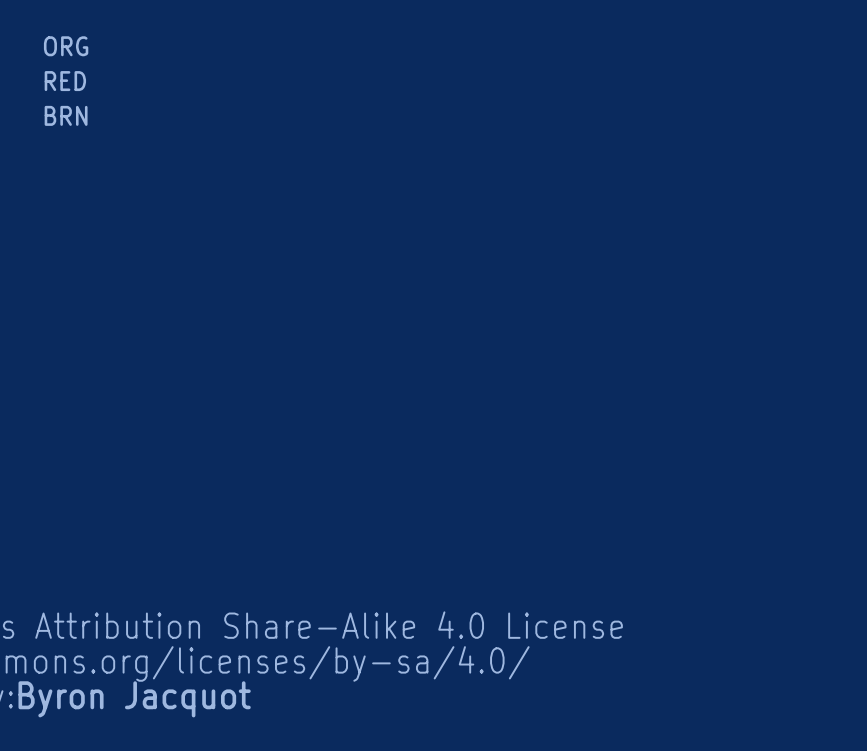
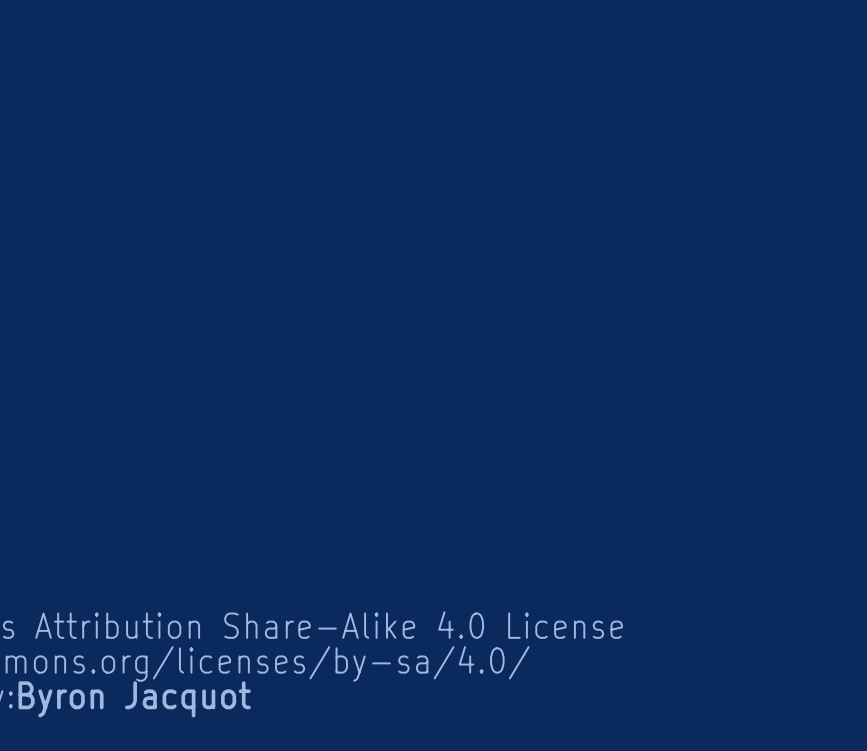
text: ORG (66, 46) -> none
text: RED (65, 81) -> none
text: BRN (66, 115) -> none

